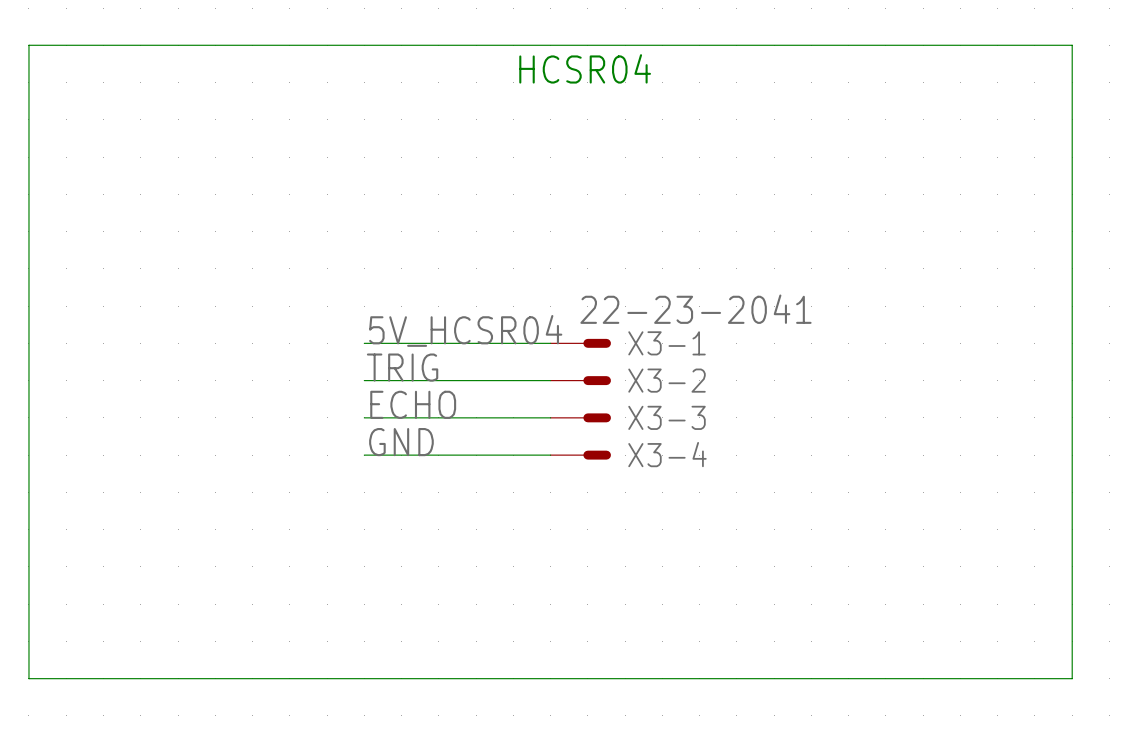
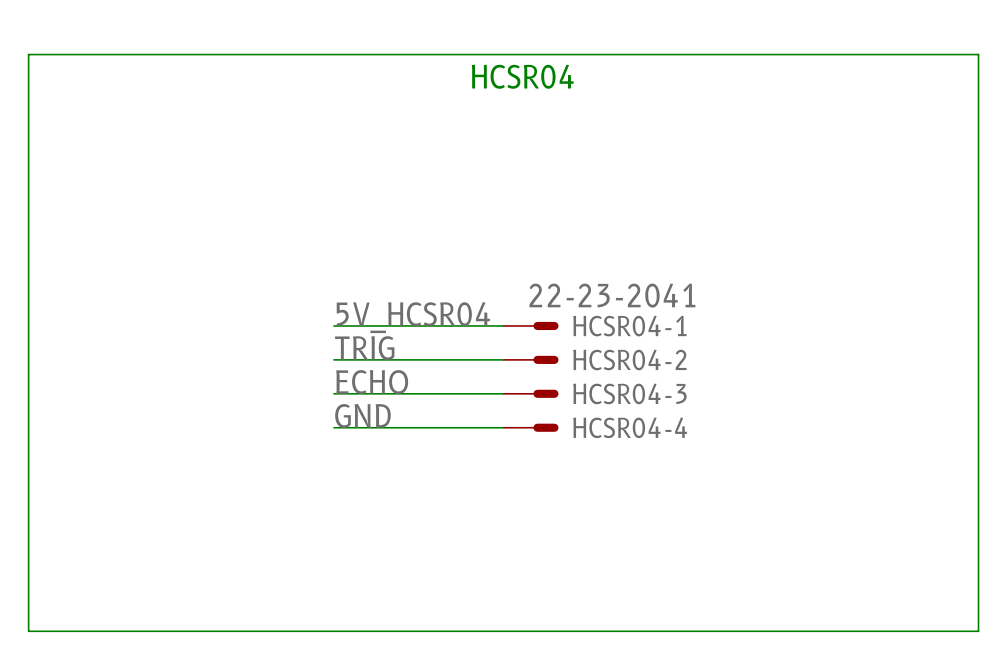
X3-1 name: X3-1 (667, 343) -> HCSR04-1 (629, 326)
X3-2 name: X3-2 (667, 380) -> HCSR04-2 (629, 360)
X3-3 name: X3-3 (667, 417) -> HCSR04-3 (629, 393)
X3-4 name: X3-4 (667, 454) -> HCSR04-4 (630, 427)

